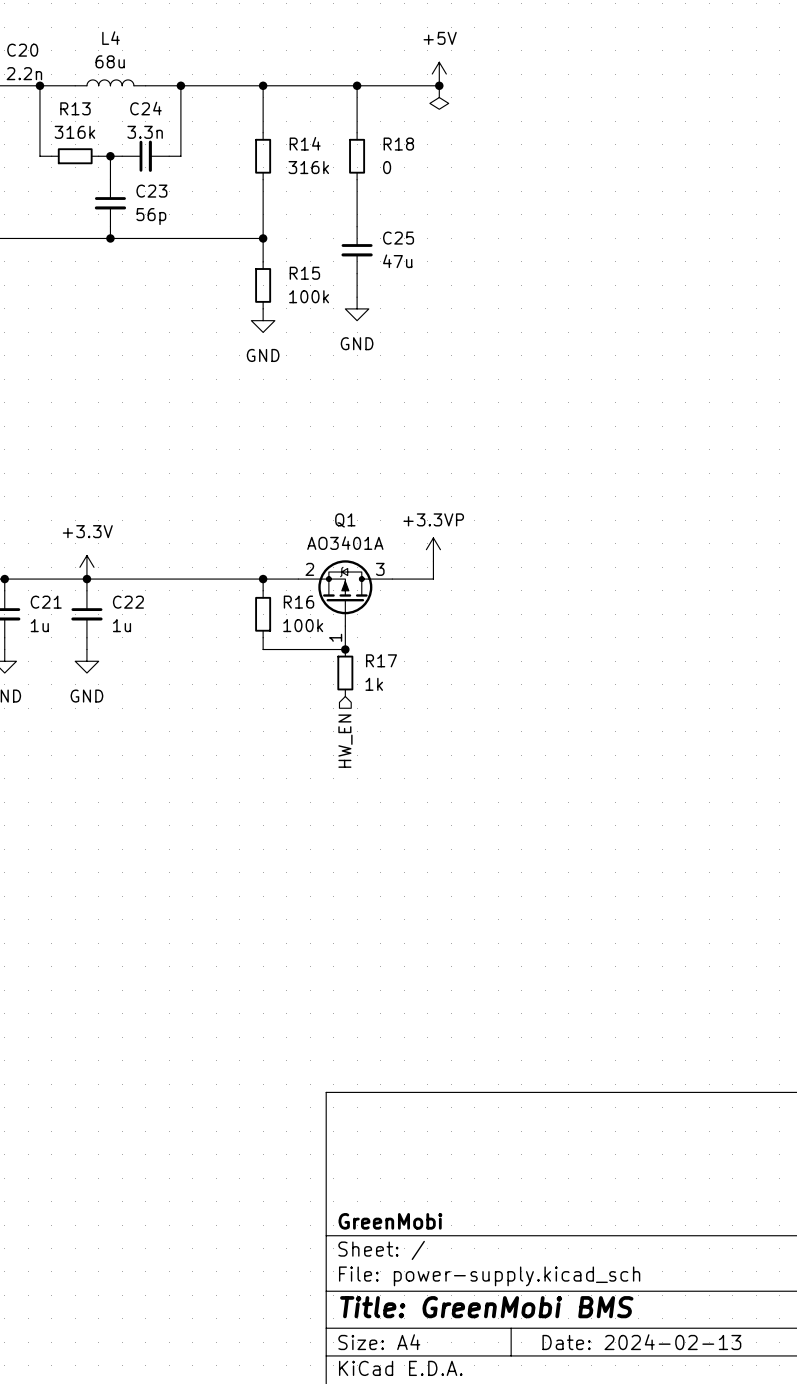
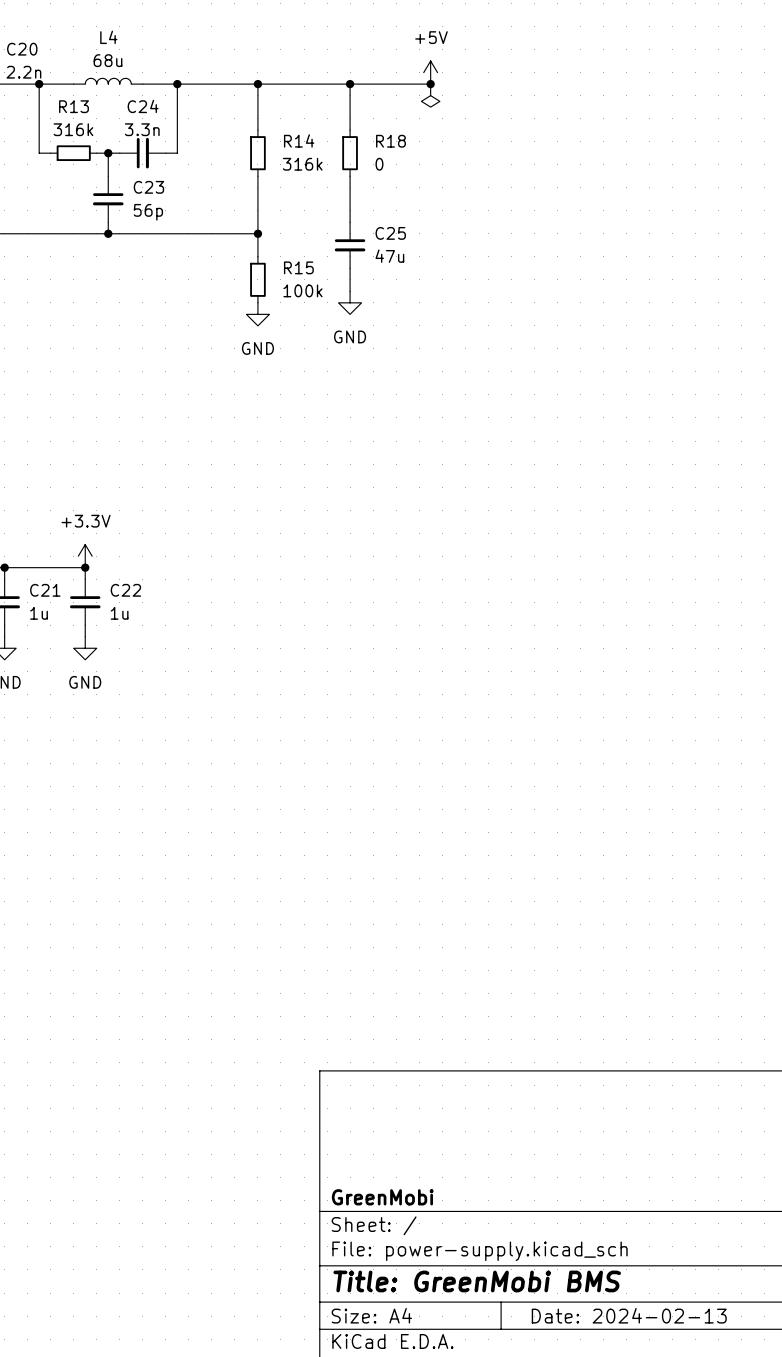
power symbol: +3.3VP (433, 549) -> none
wire: (433, 561) (433, 579) (392, 579) -> none
wire: (86, 579) (298, 579) -> none
wire: (263, 579) (263, 590) -> none
junction: (263, 579) -> none
Q1: AO3401A (345, 604) -> none
R16: 100k (263, 614) -> none
wire: (263, 637) (263, 649) (345, 649) -> none
junction: (345, 649) -> none
R17: 1k (345, 673) -> none
hierarchical label: HW_EN (345, 741) -> none

